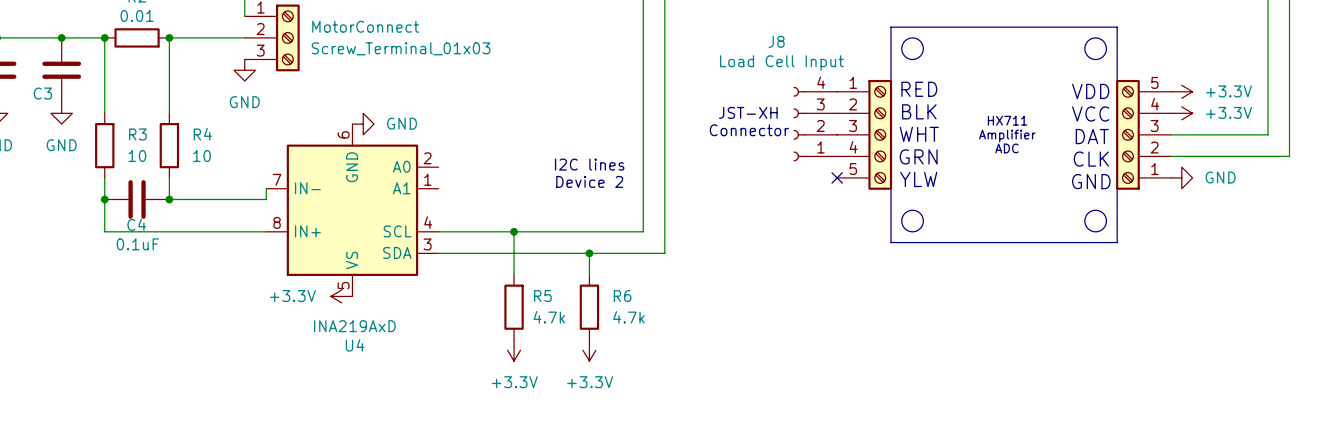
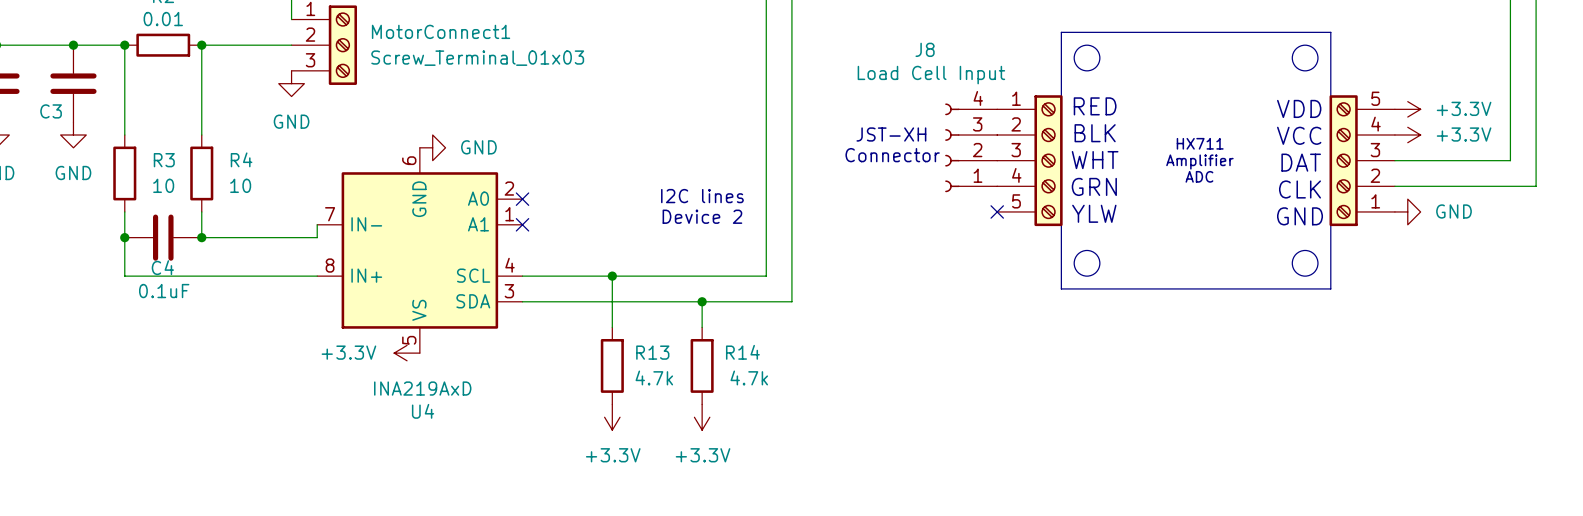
MotorConnect name: MotorConnect (365, 26) -> MotorConnect1 (441, 31)
no-connect mark: none -> (522, 199)
no-connect mark: none -> (522, 224)
R5 name: R5 (542, 296) -> R13 (652, 352)
R6 name: R6 (622, 296) -> R14 (742, 352)

